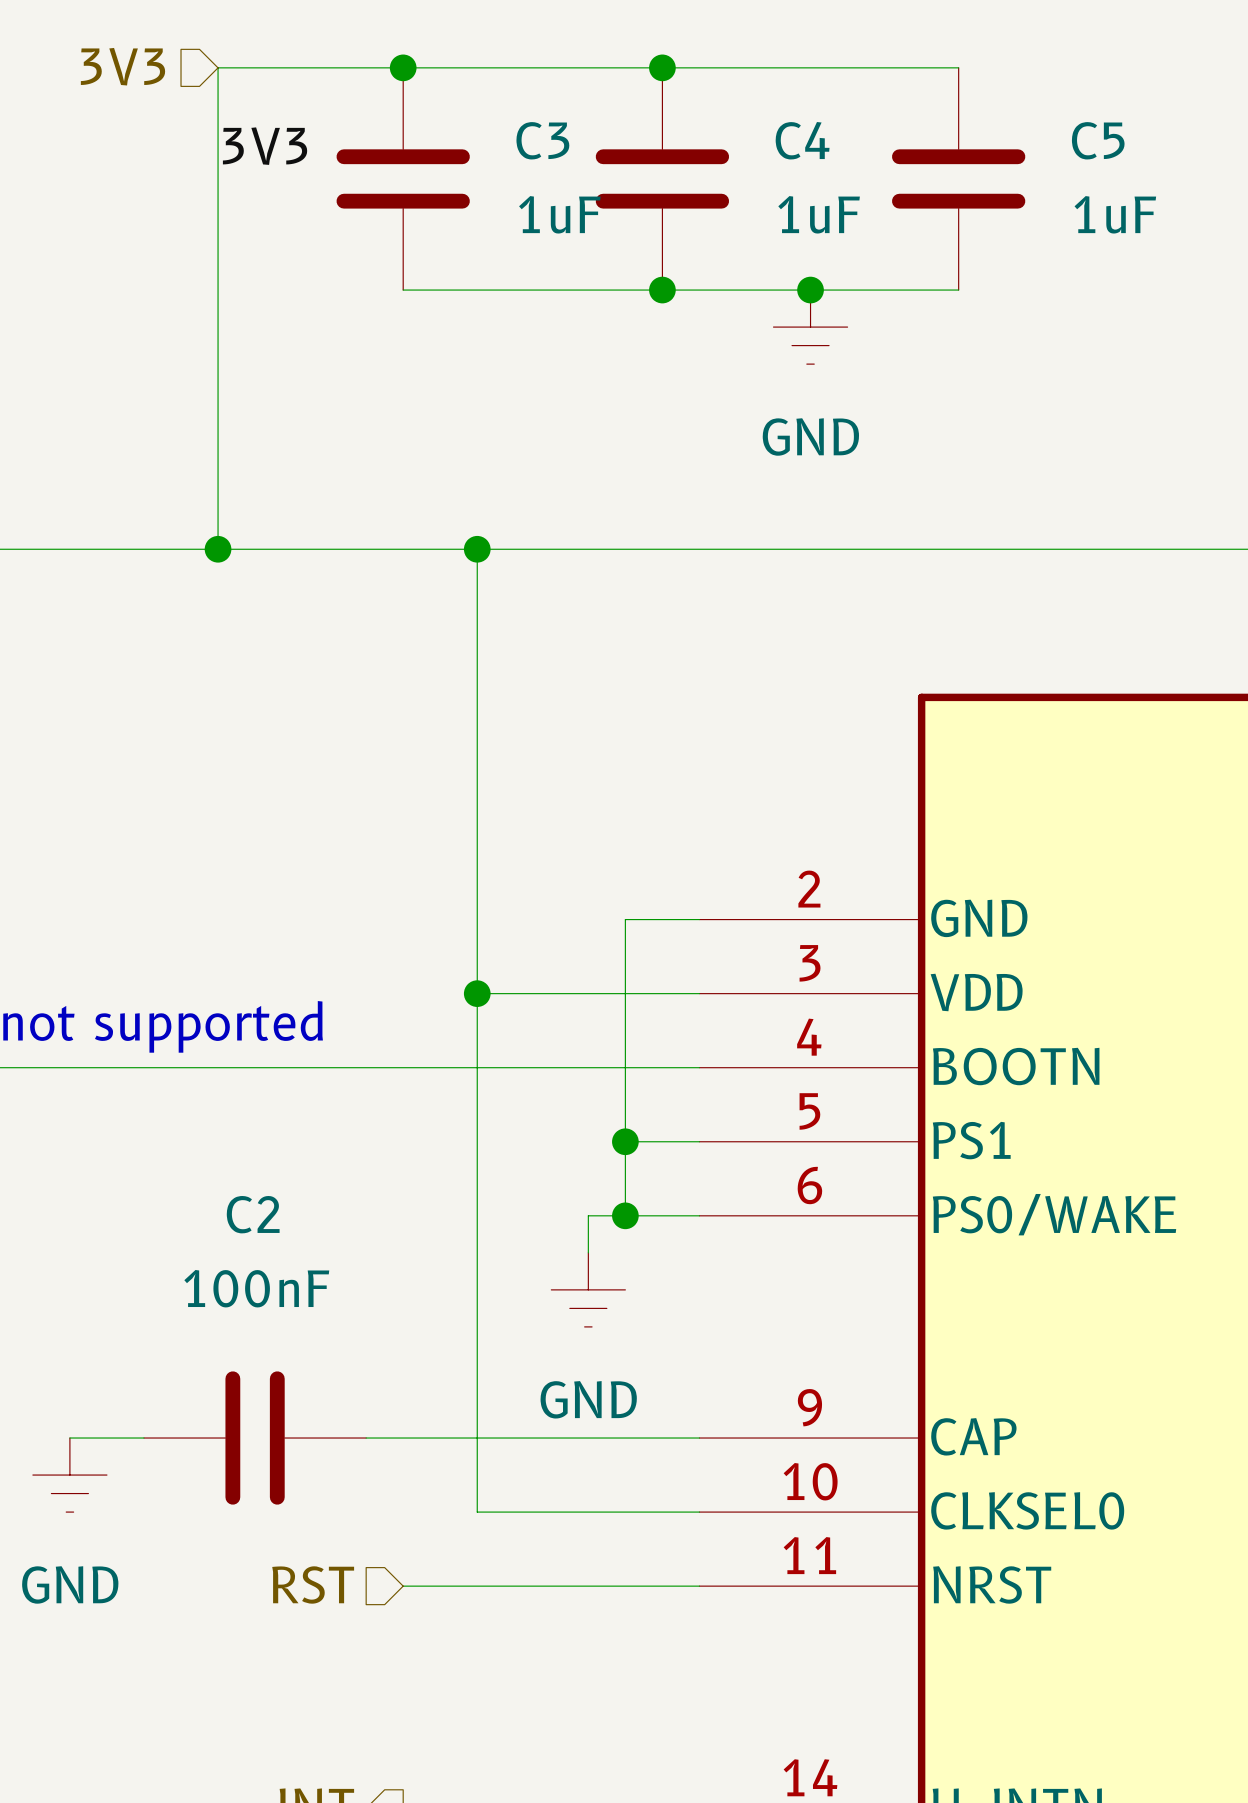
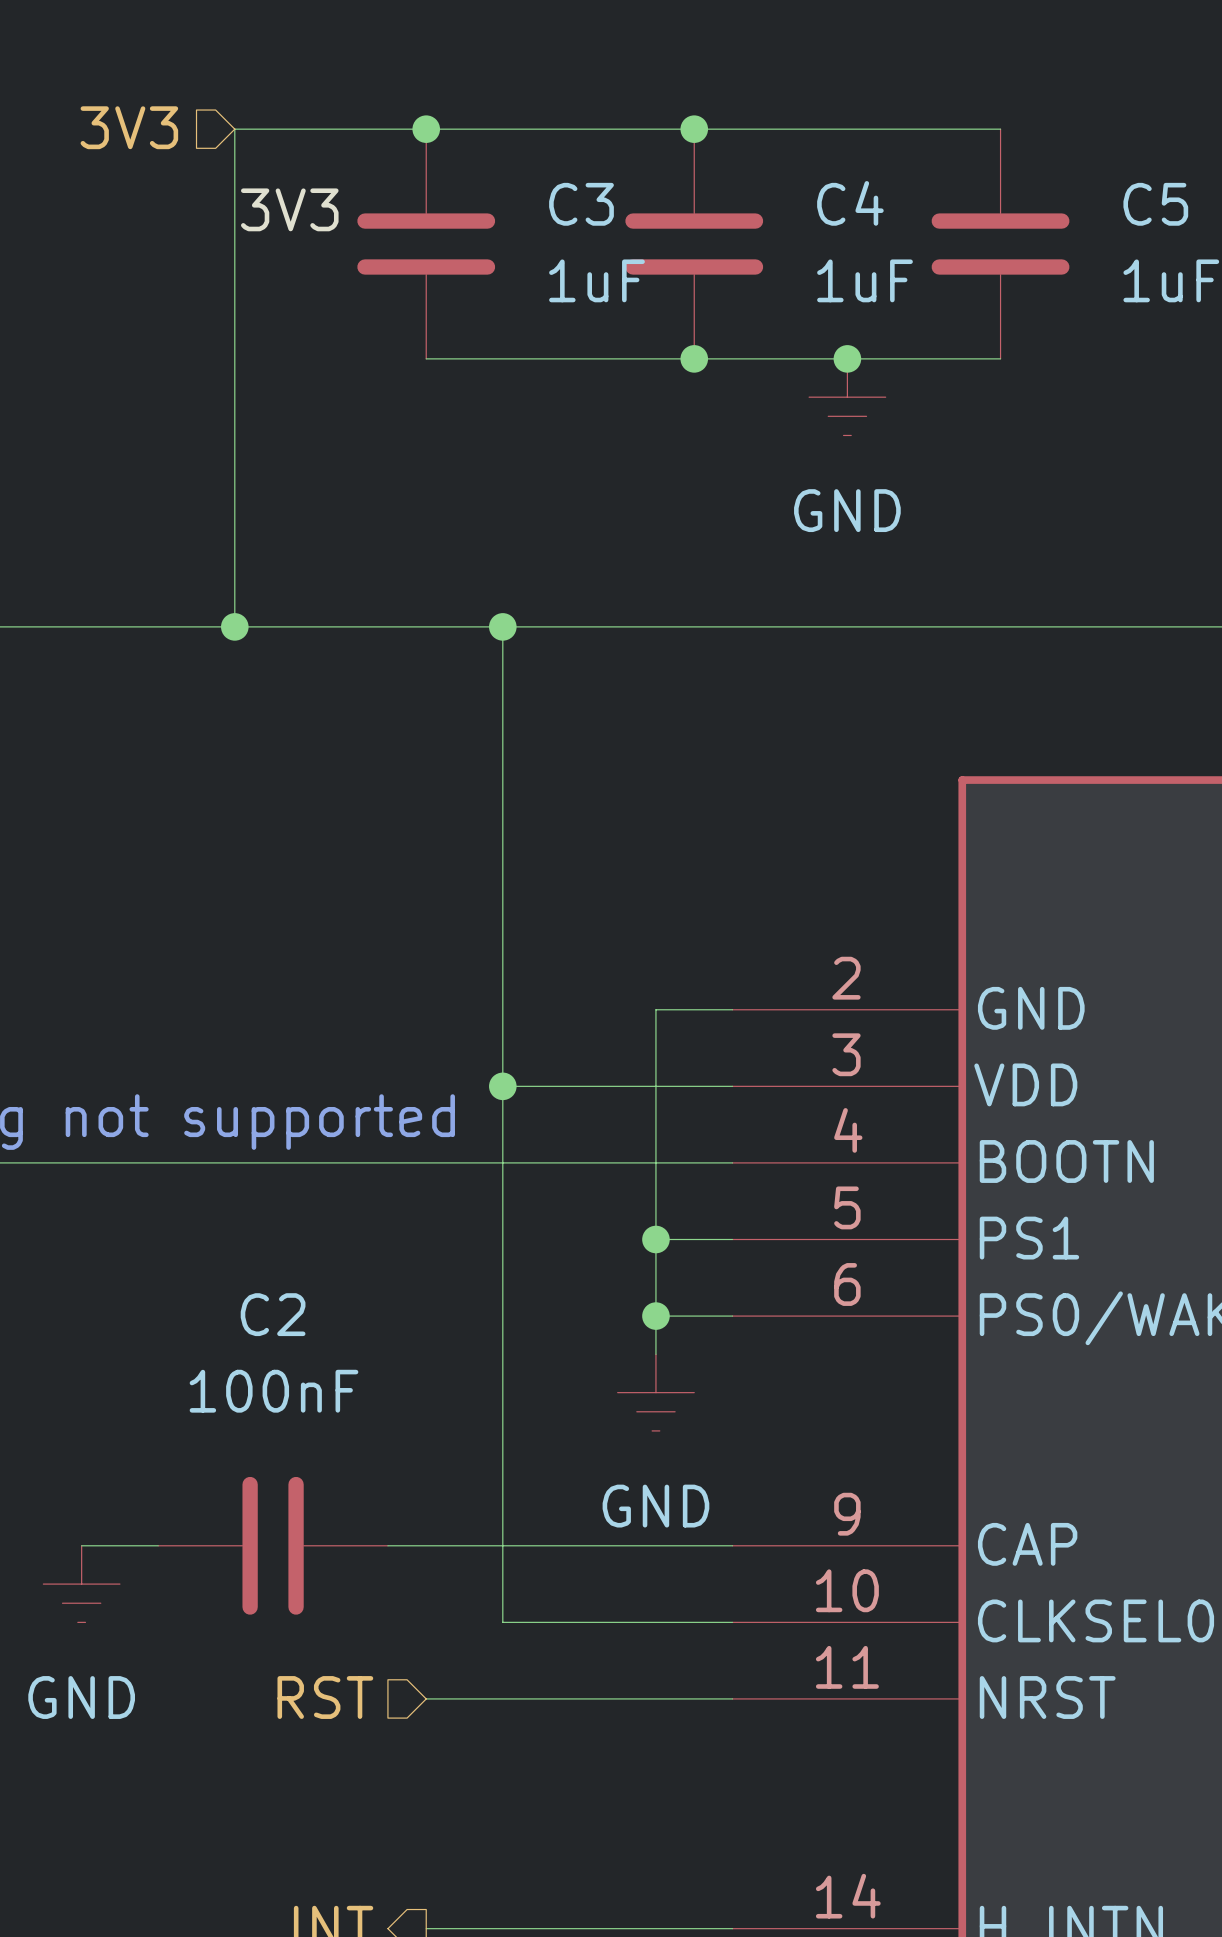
wire: (625, 1215) (588, 1215) (588, 1252) -> (655, 1316) (655, 1354)
power symbol position: GND (588, 1289) -> GND (655, 1392)

